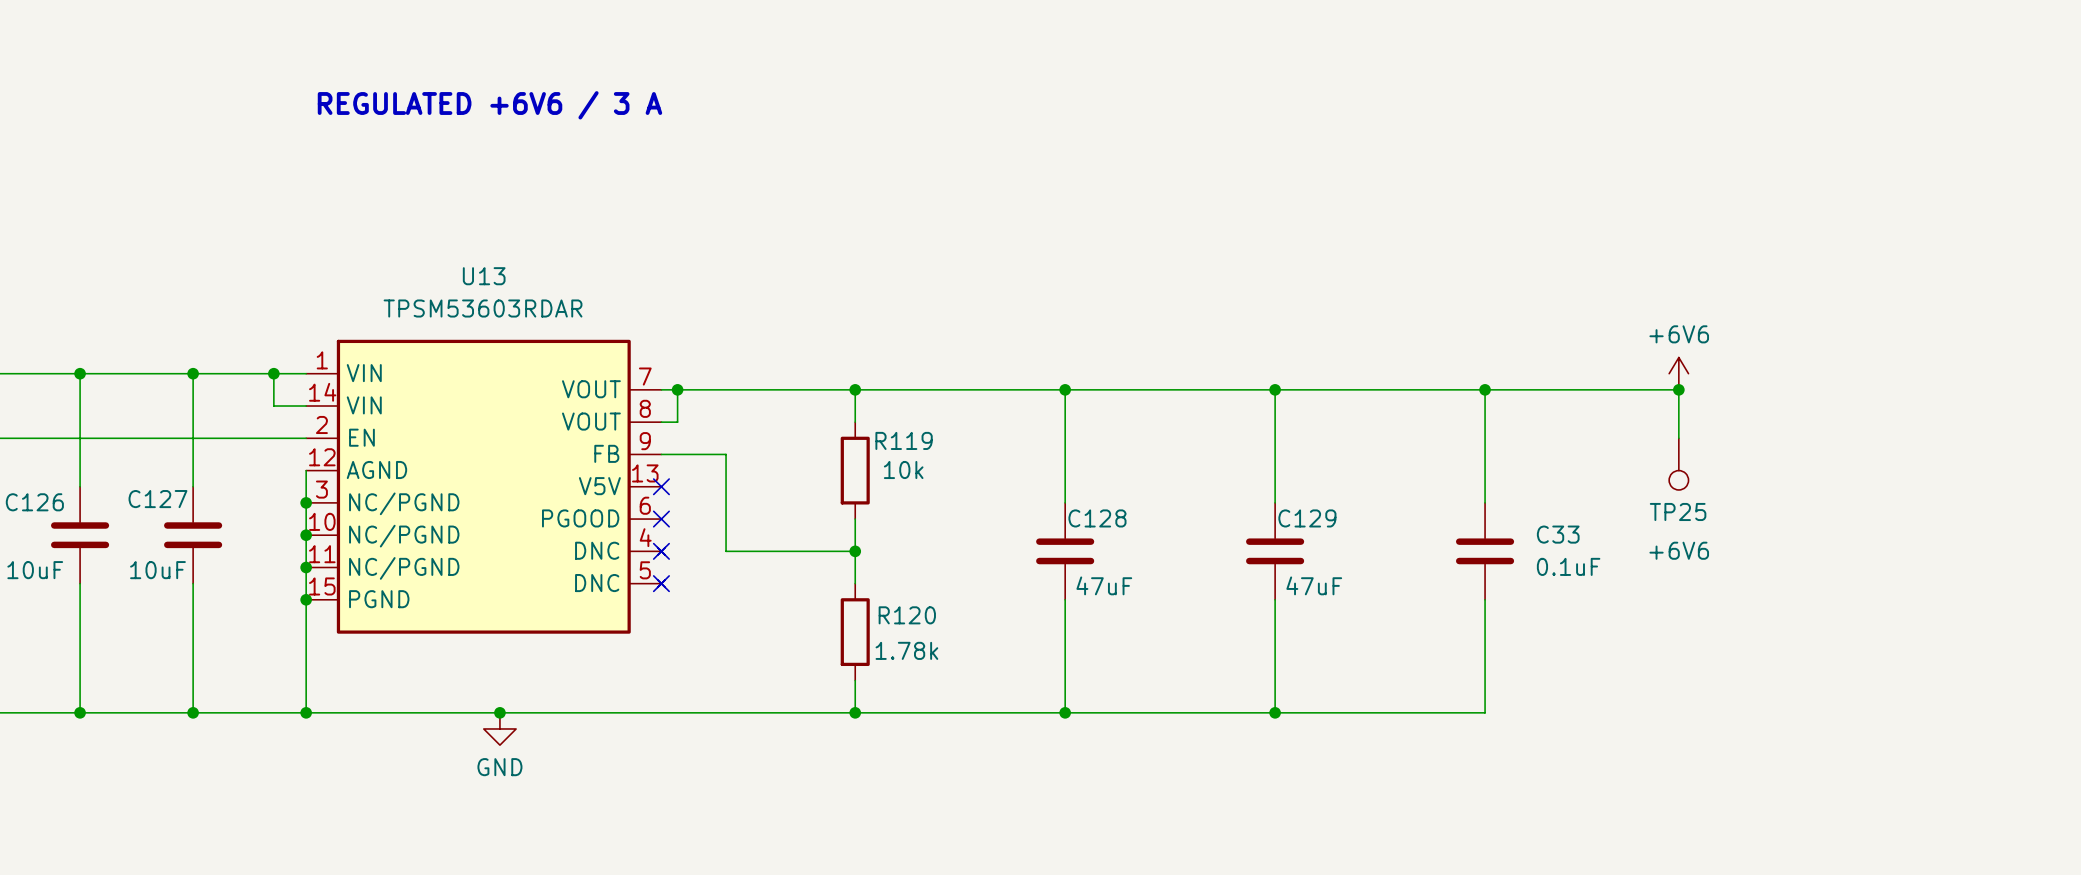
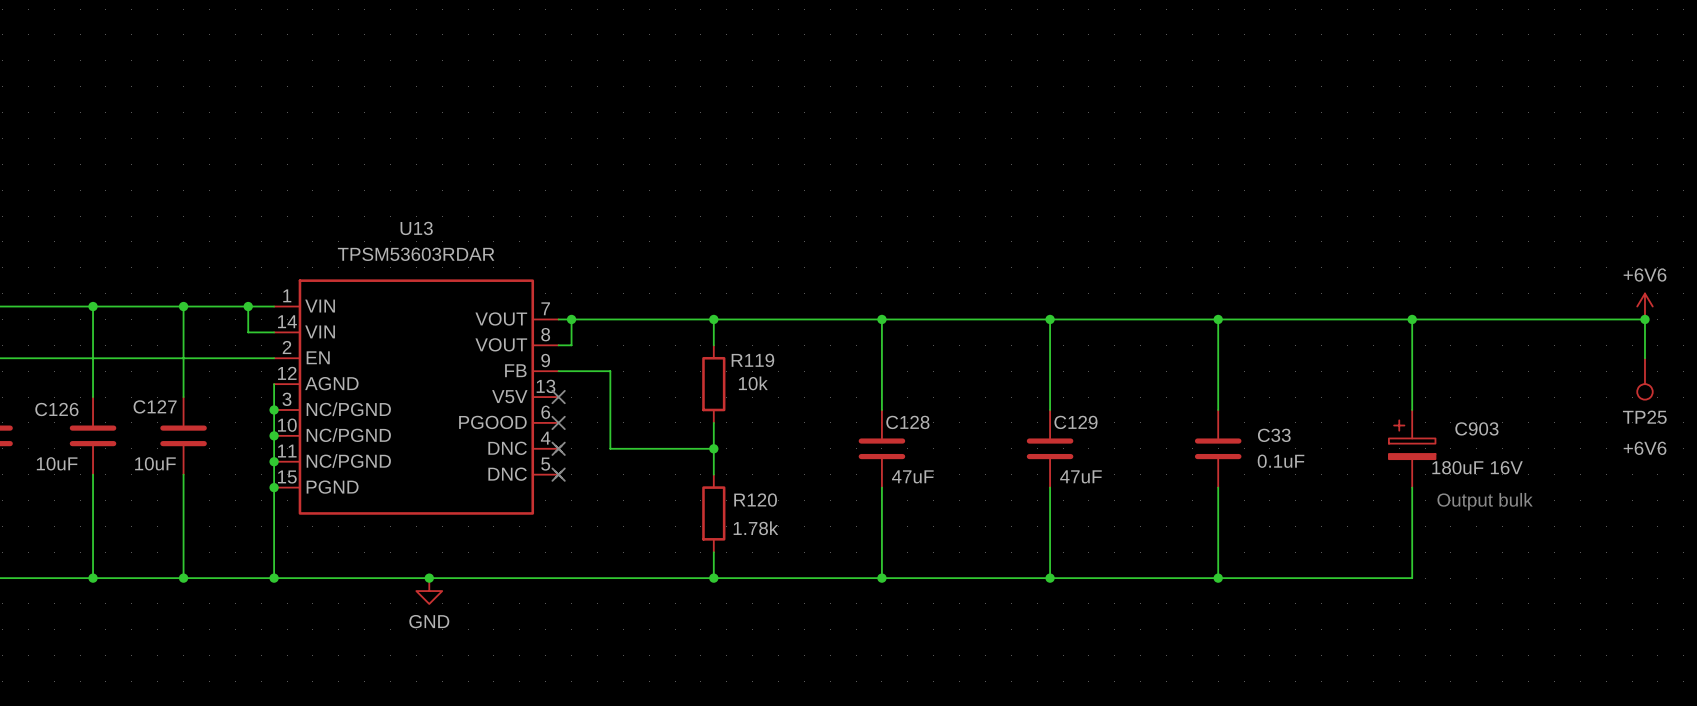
text: REGULATED +6V6 / 3 A (489, 105) -> none
power symbol: +6V6 (1678, 373) -> none
power symbol: none -> +6V6 (1644, 306)
wire: (1678, 389) (1678, 438) -> (1373, 319) (1644, 319) (1644, 358)
junction position: (1678, 389) -> (1412, 319)
wire: none -> (1412, 319) (1412, 409)
junction: none -> (1644, 319)
TP25 position: (1678, 464) -> (1644, 378)
C903: none -> 180uF 16V (1412, 448)
wire: none -> (1412, 487) (1412, 578) (1218, 578)
text: none -> Output bulk (1485, 501)
junction: none -> (1218, 578)

